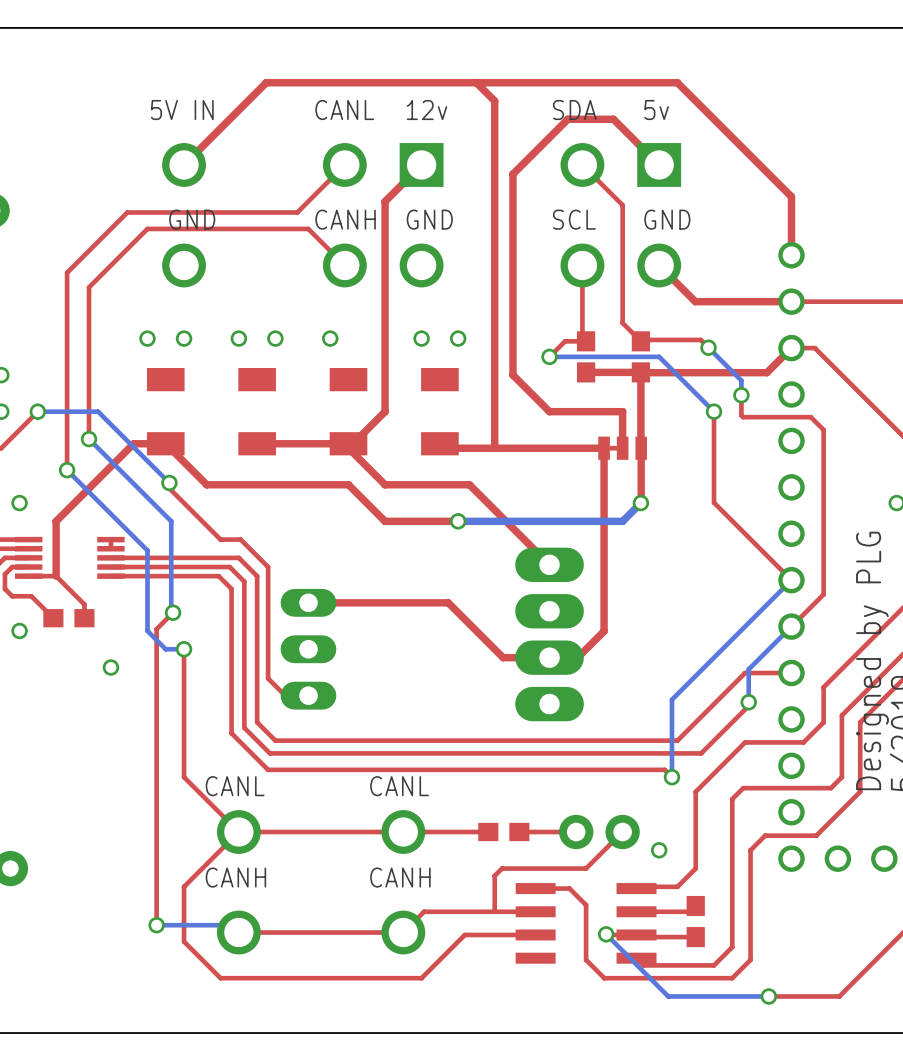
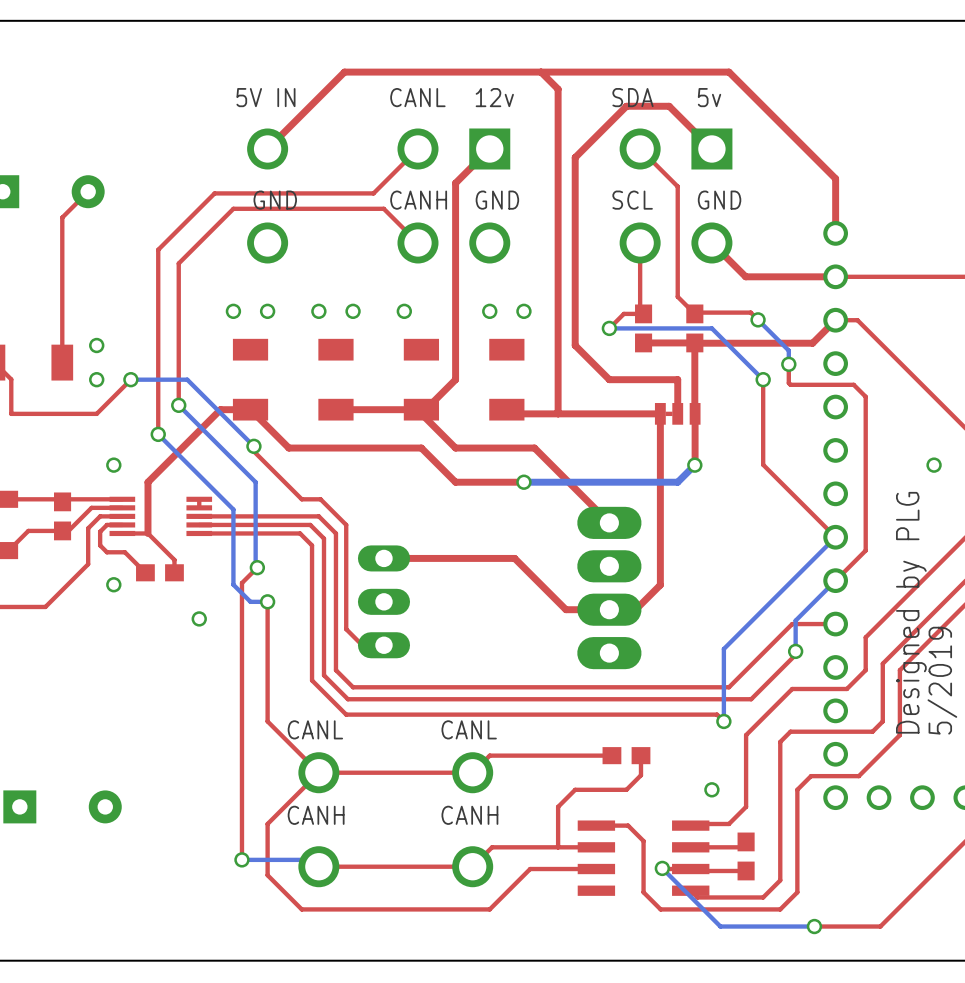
top track: (488, 832) (403, 832) -> (611, 755) (489, 755) (472, 772)
part position: (503, 832) -> (626, 755)
top track: (576, 832) (519, 832) -> none
part: (599, 832) -> none
top track: (622, 832) (586, 868) (502, 868) (494, 875) -> (640, 755) (640, 775) (626, 789) (575, 789) (558, 806) (558, 813)

